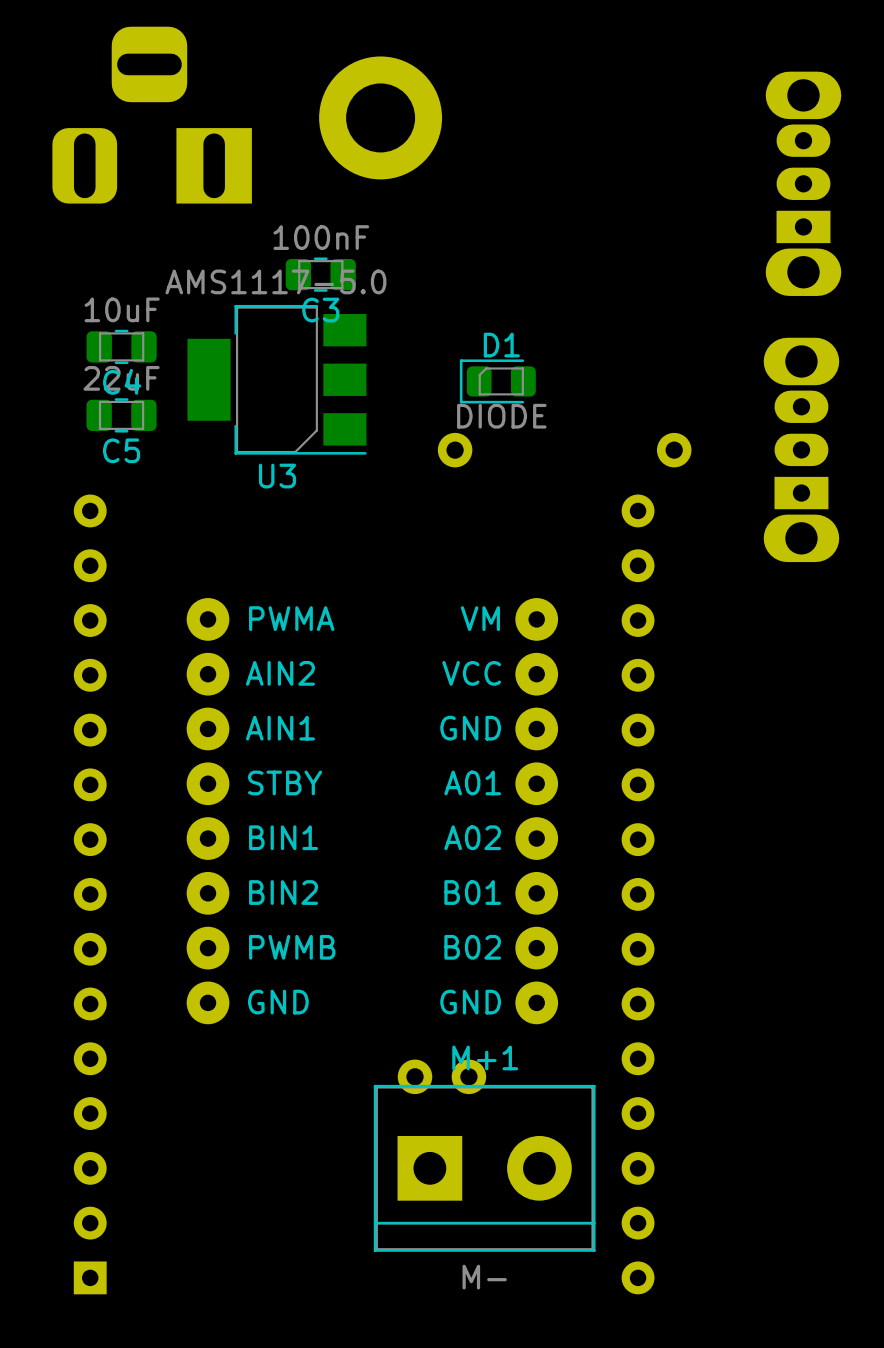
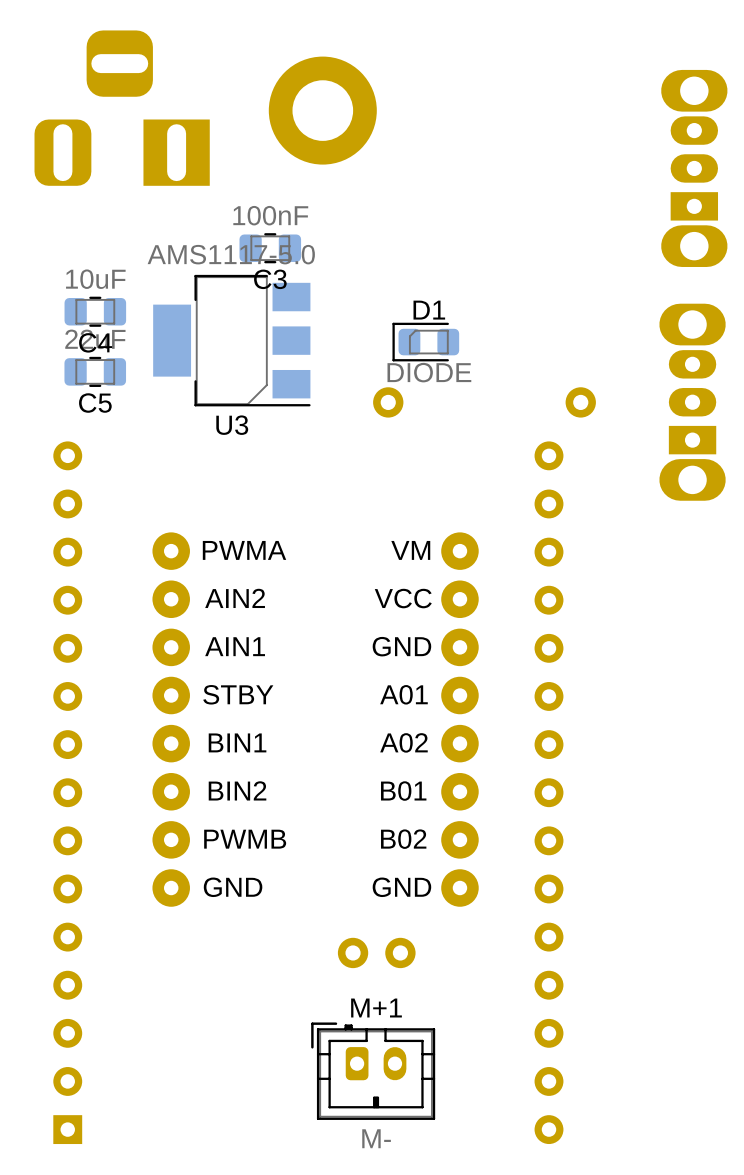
M+1 footprint: [373, 1084, 596, 1252] -> [311, 1022, 436, 1120]

